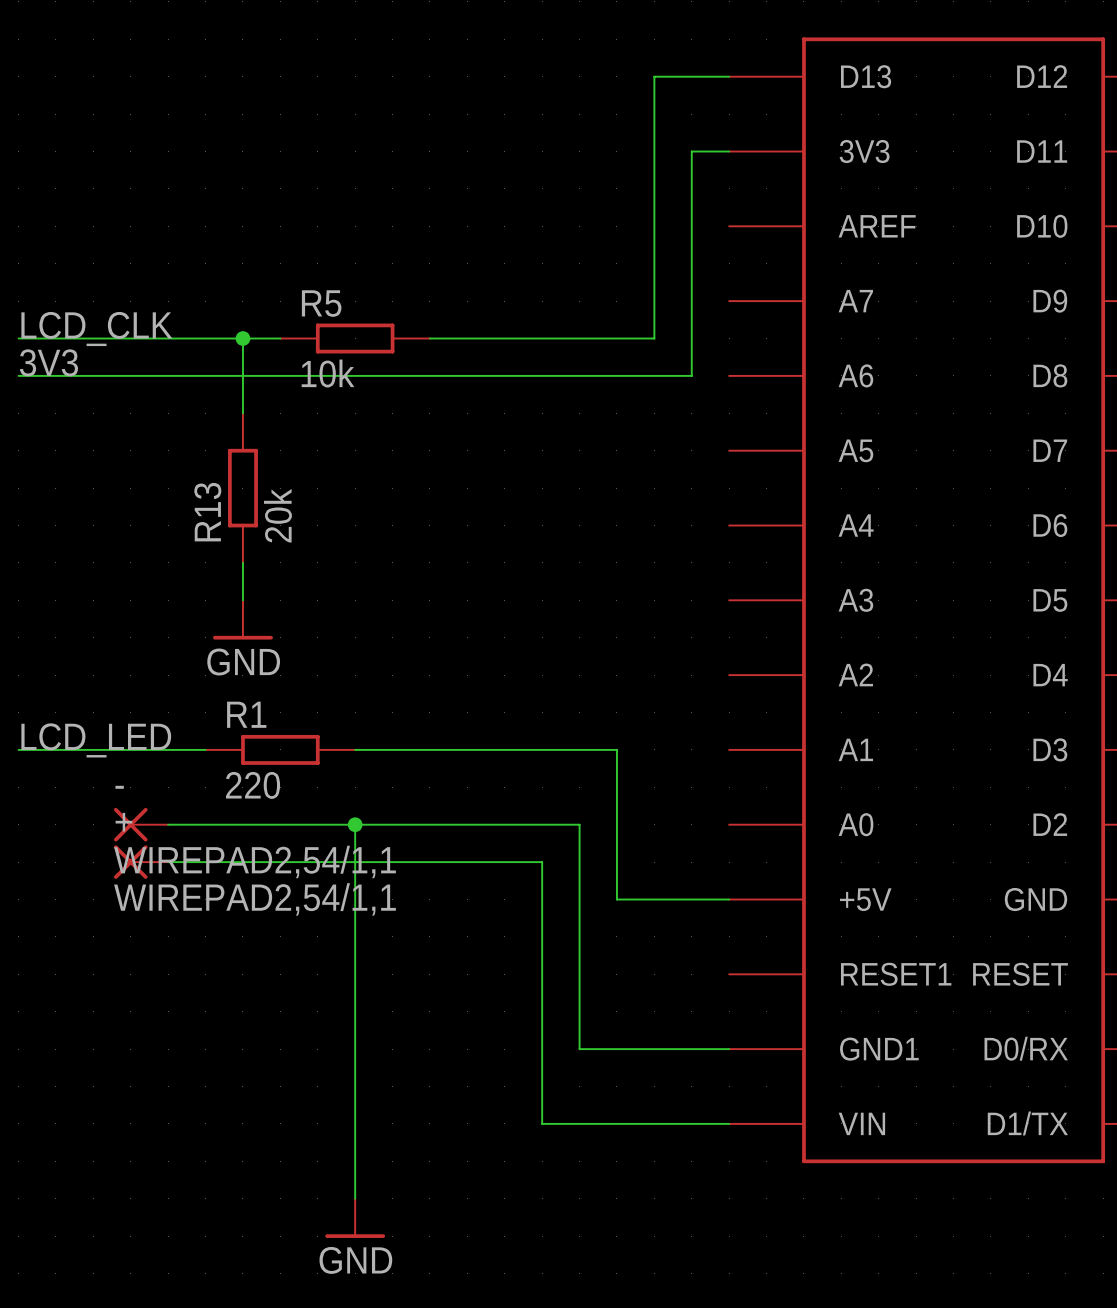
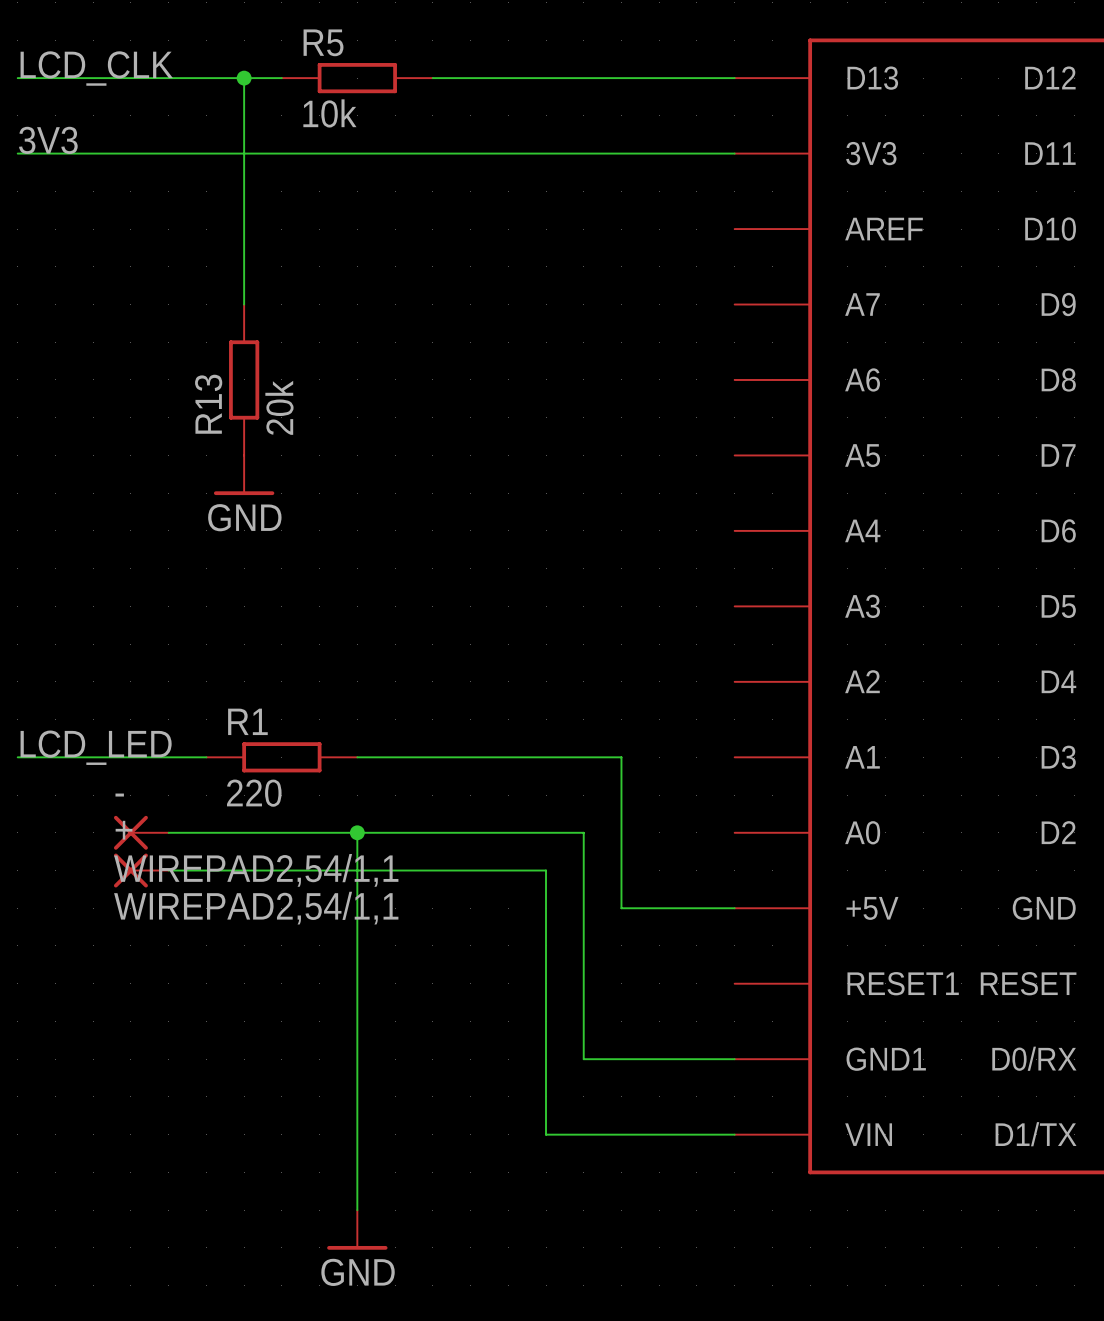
wire: none -> (244, 78) (244, 304)
junction: none -> (244, 78)
wire: (654, 76) (654, 338) (429, 338) -> (659, 78) (432, 78)
wire: (691, 151) (691, 375) (18, 375) -> (696, 153) (17, 153)
label position: LCD_CLK (96, 329) -> LCD_CLK (96, 68)
wire: (18, 338) (280, 338) -> (17, 78) (281, 78)
wire: (242, 338) (242, 413) -> none
junction: (242, 338) -> none
R5 position: (355, 338) -> (357, 78)
label position: 3V3 (48, 362) -> 3V3 (48, 140)
R13 position: (242, 488) -> (244, 379)
wire: (242, 562) (242, 600) -> none
power symbol position: GND (242, 619) -> GND (244, 475)

